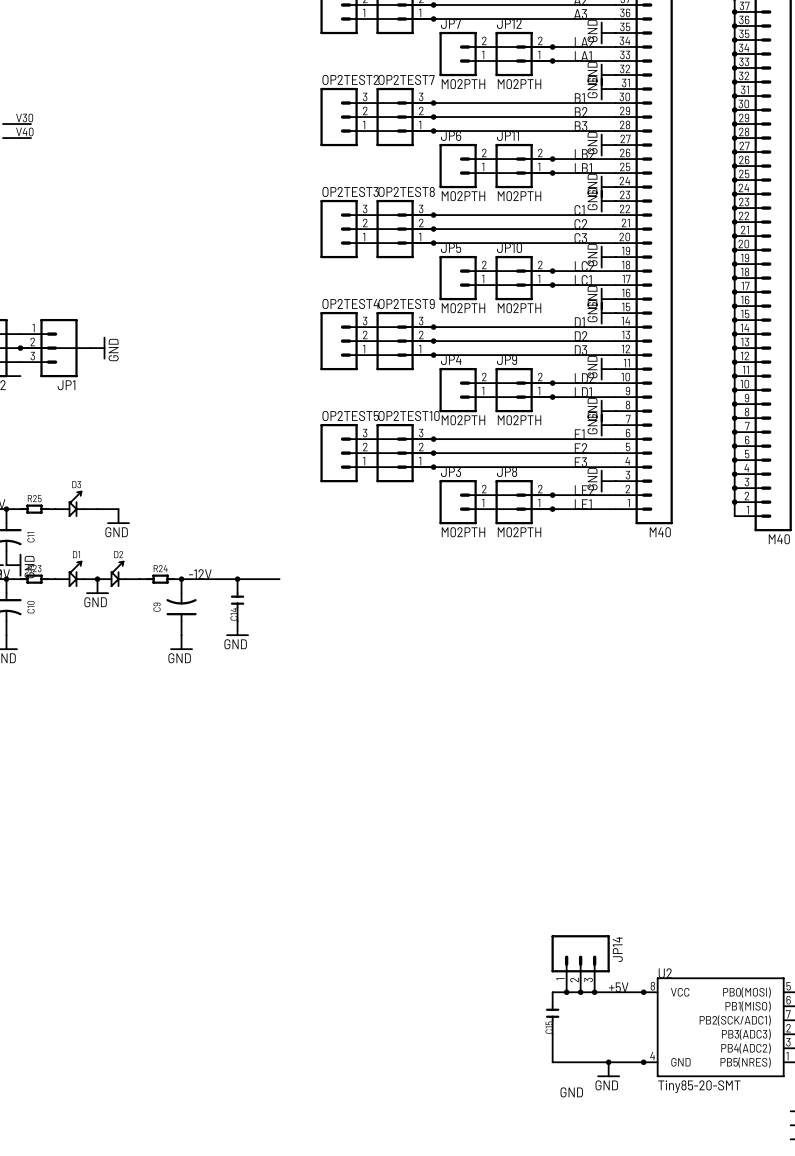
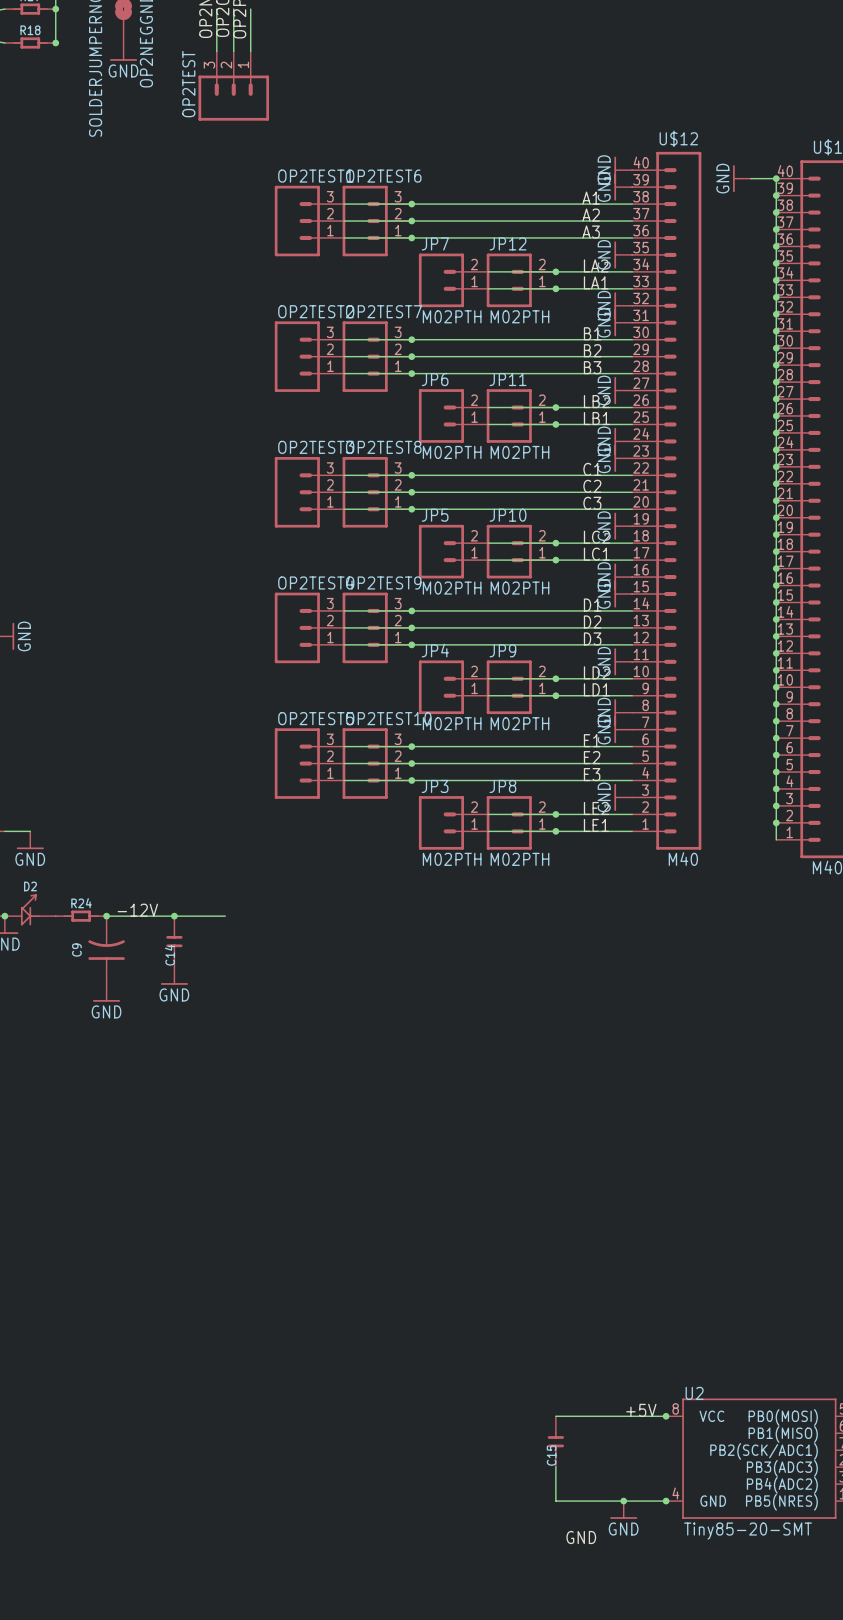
JP14: (580, 963) -> none
junction: (566, 992) -> none
junction: (580, 992) -> none
junction: (594, 992) -> none

